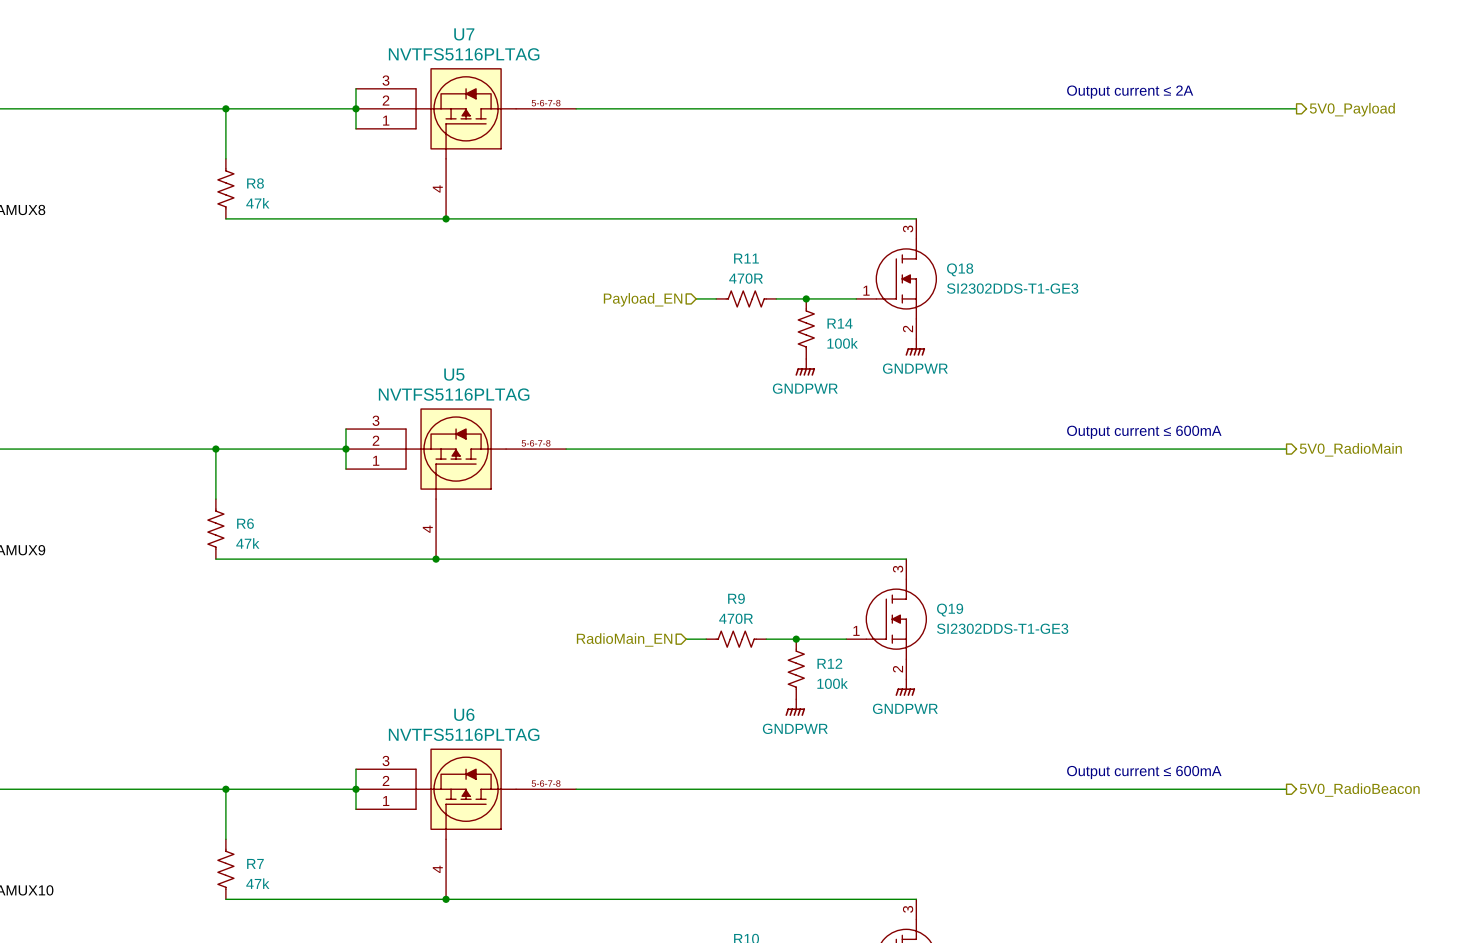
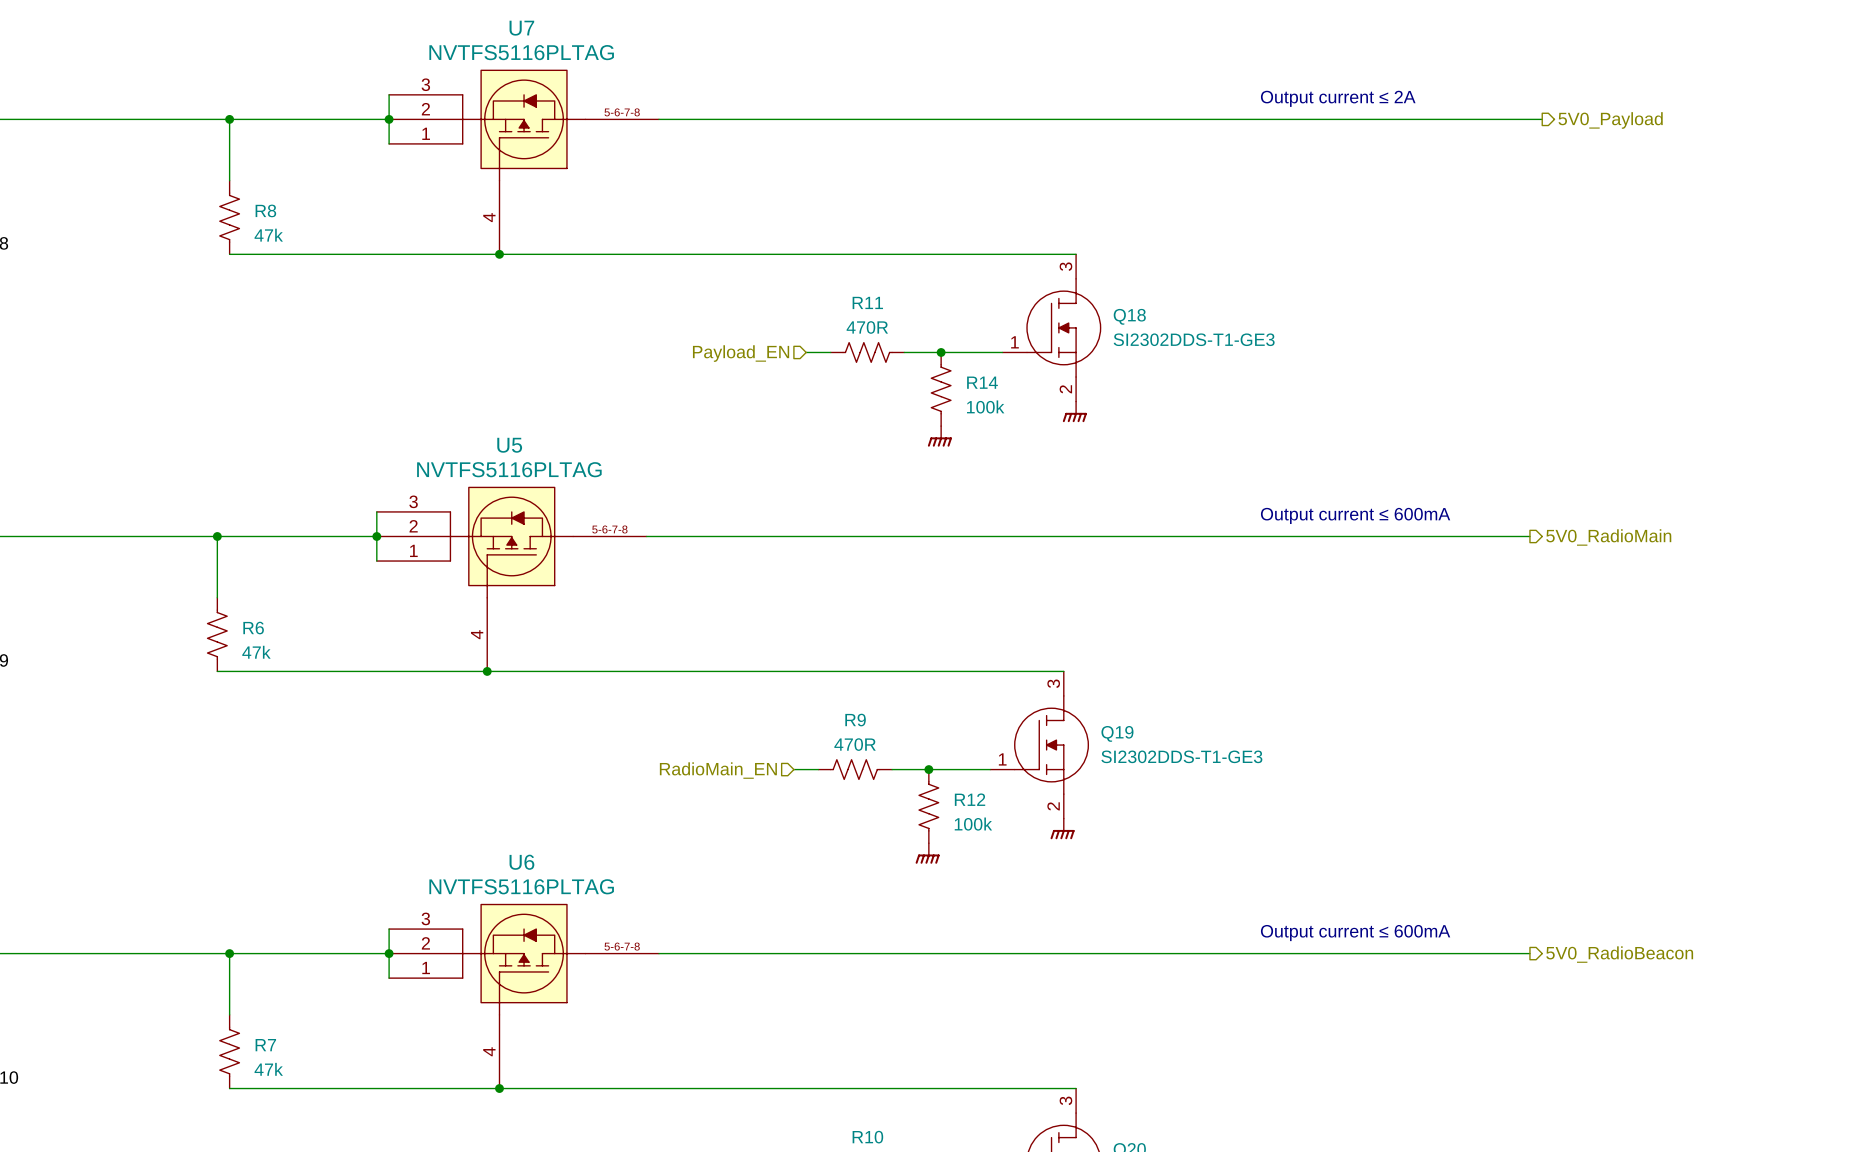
power symbol text: GNDPWR (915, 368) -> none
power symbol text: GNDPWR (805, 388) -> none
power symbol text: GNDPWR (905, 708) -> none
power symbol text: GNDPWR (795, 728) -> none

